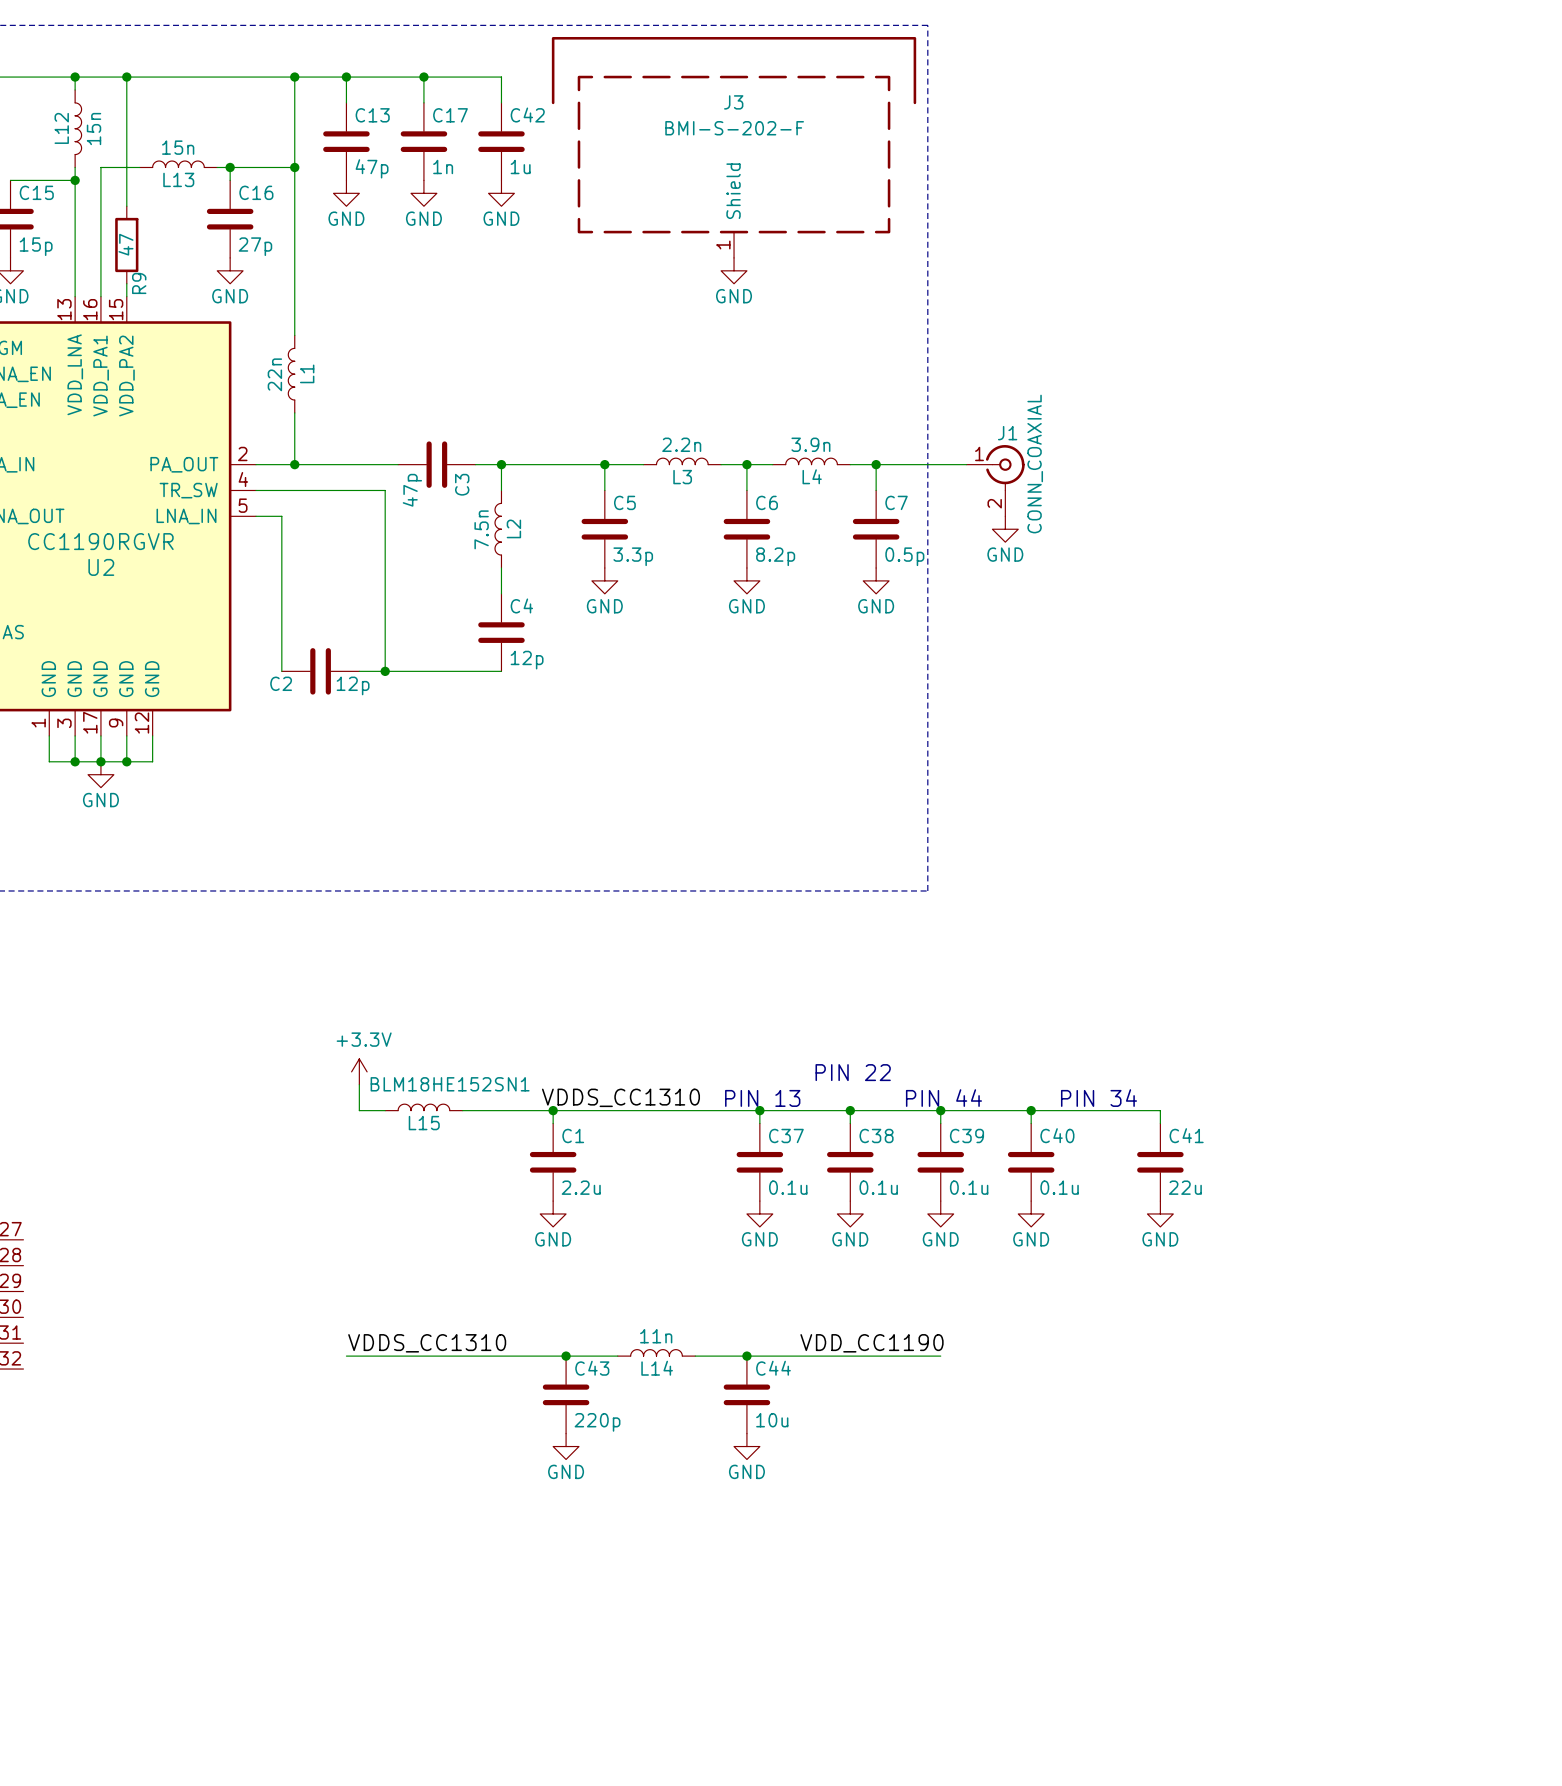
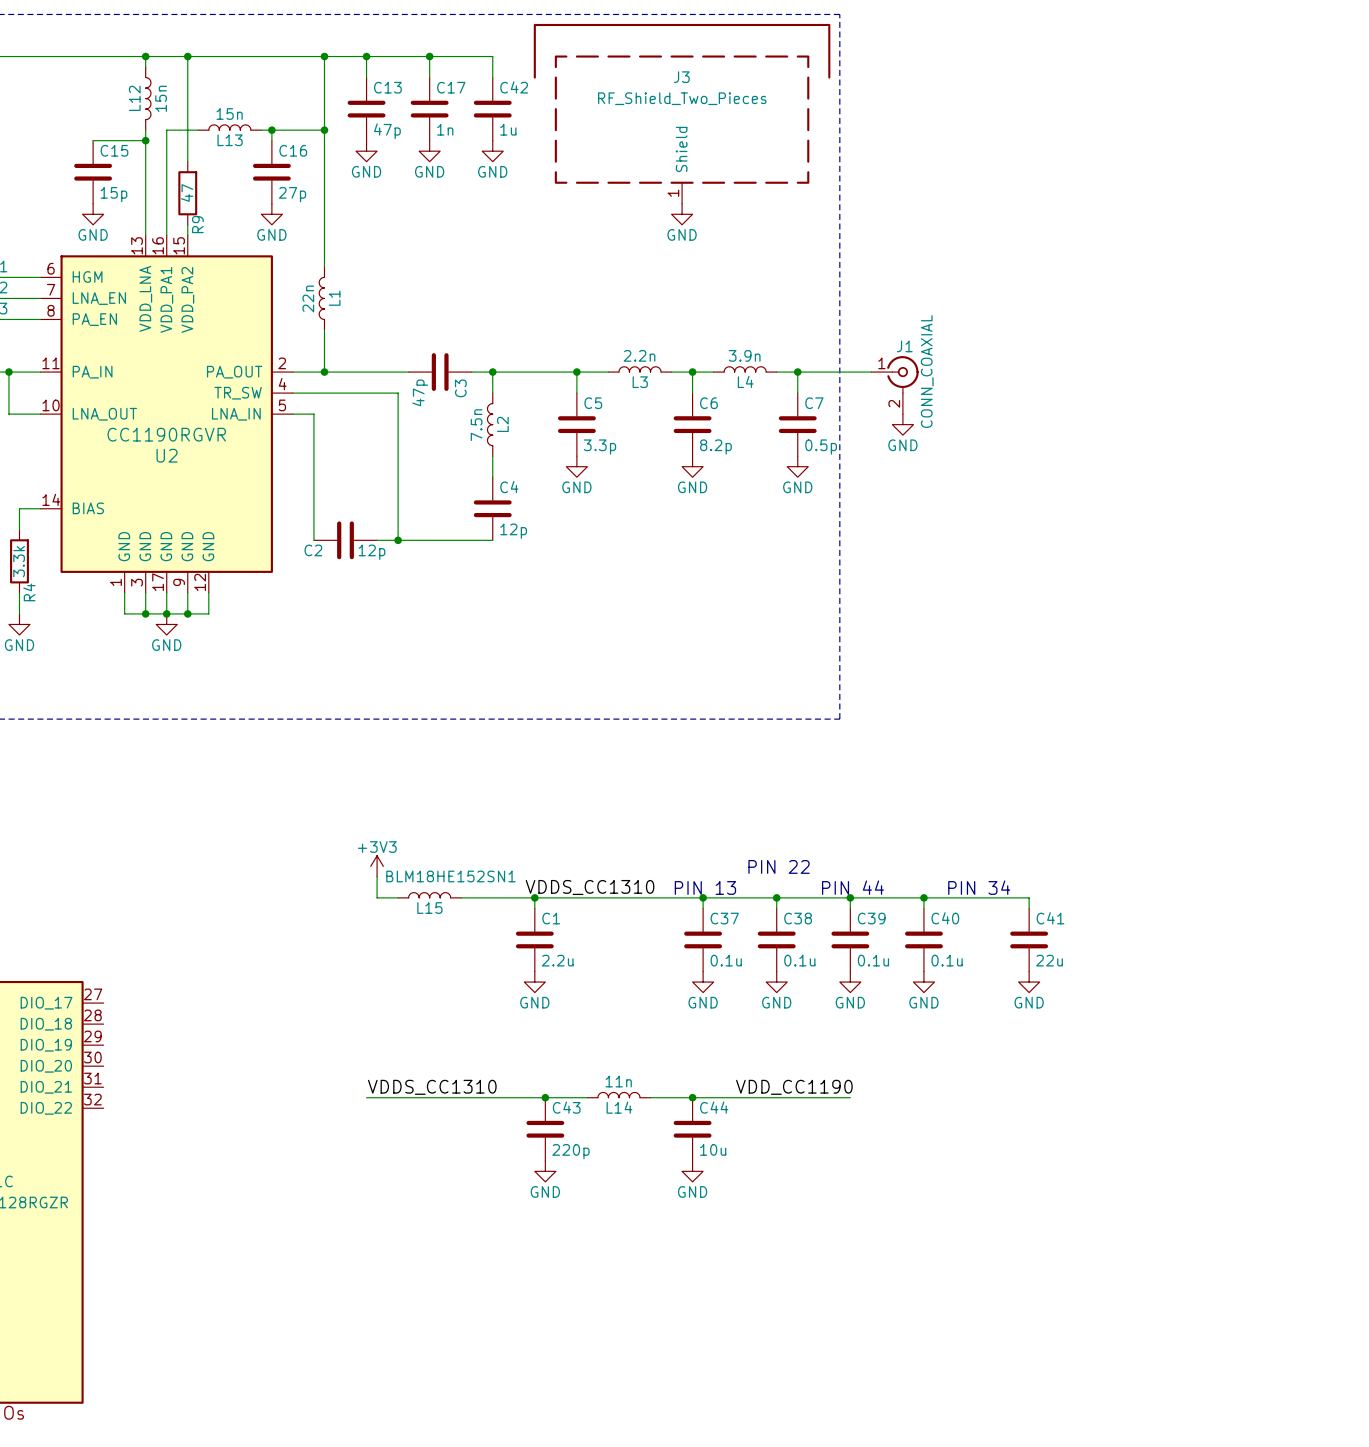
J3 value: BMI-S-202-F (734, 128) -> RF_Shield_Two_Pieces (682, 98)
power symbol: +3.3V (359, 1071) -> +3V3 (377, 866)

